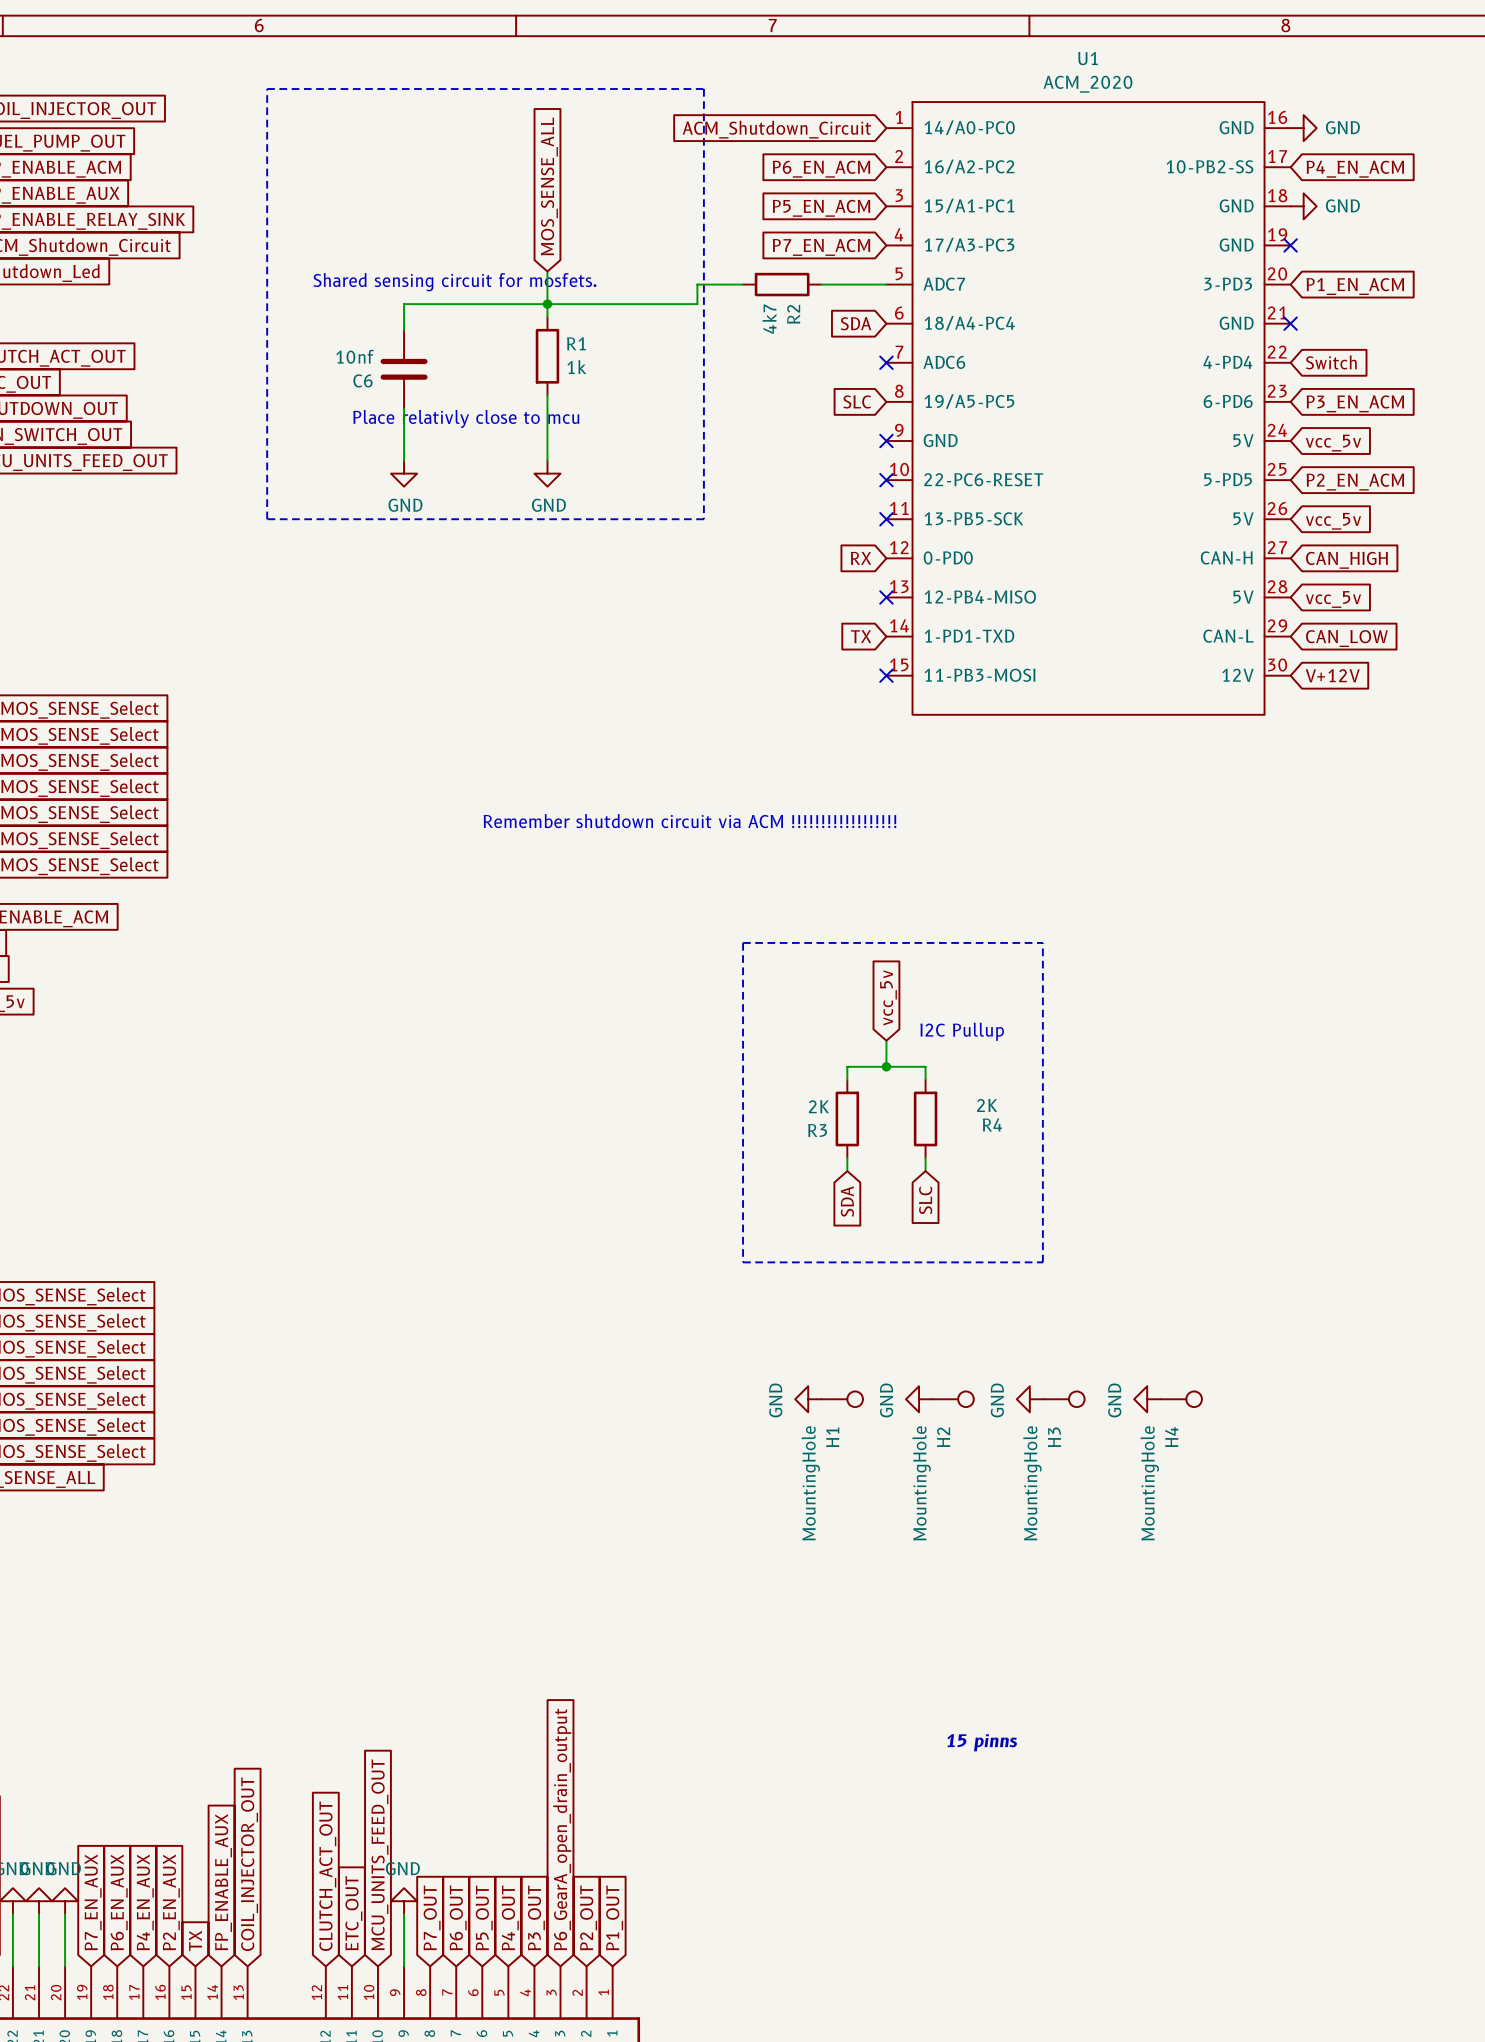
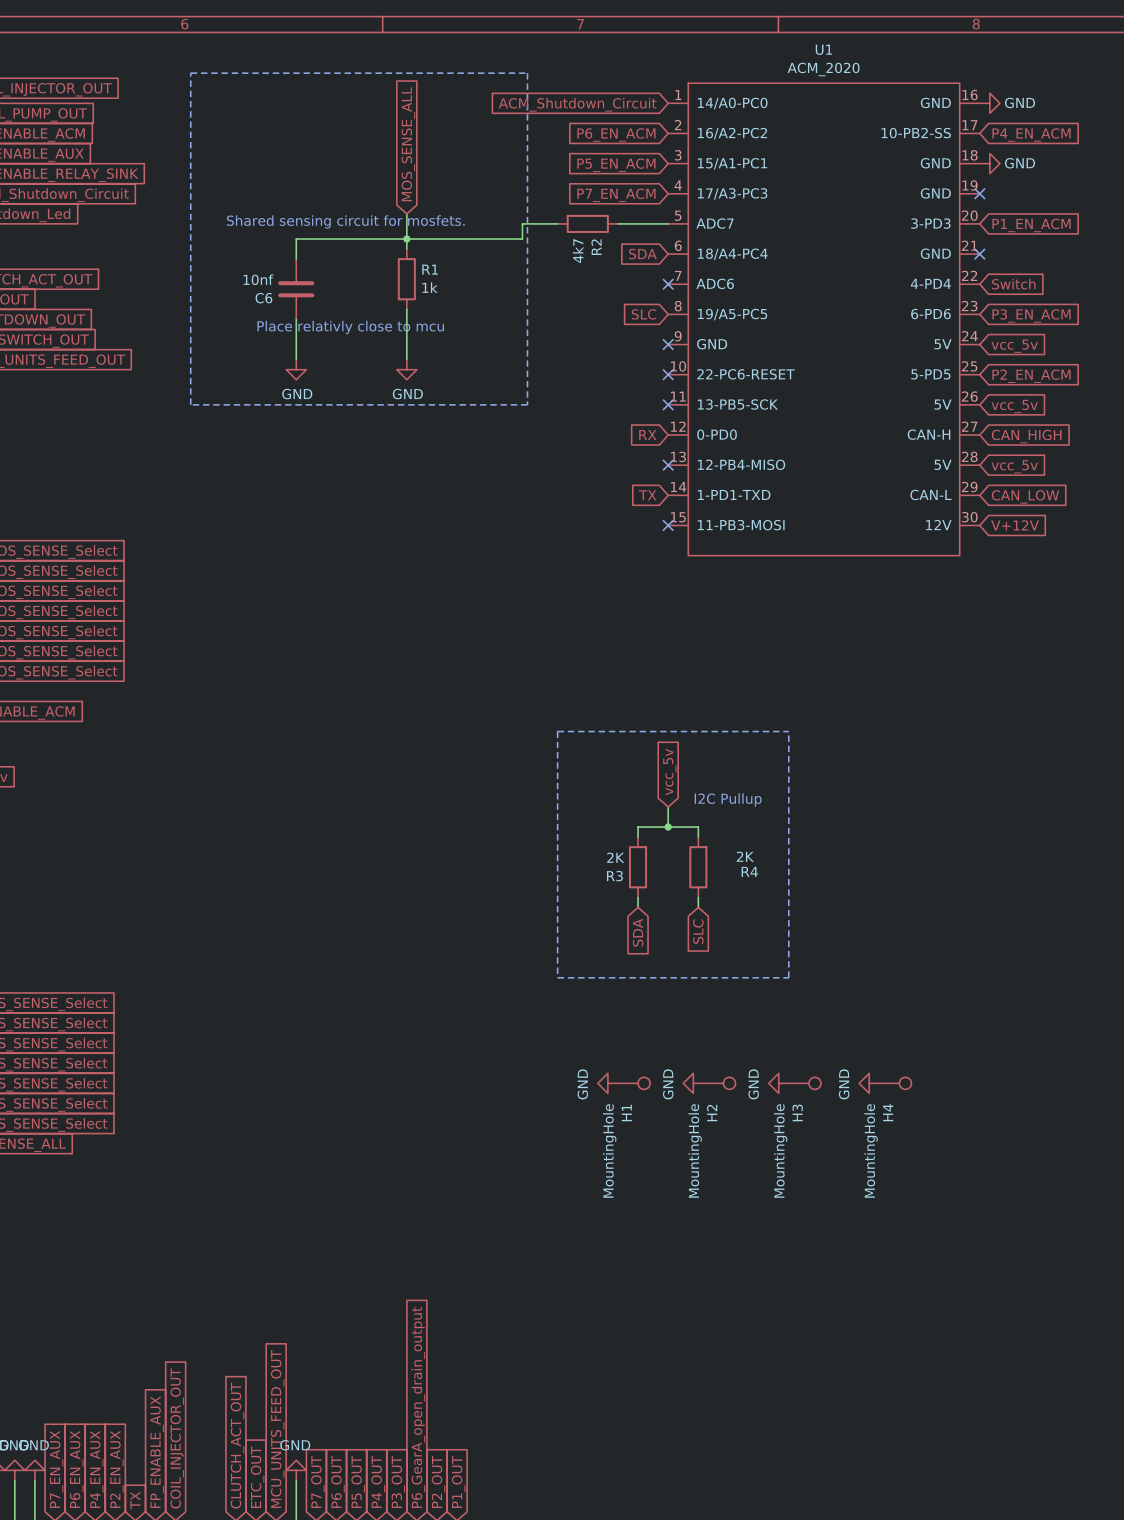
text: Remember shutdown circuit via ACM !!!!!!!!!!!!!!!!!! (690, 821) -> none
text: 15 pinns (982, 1742) -> none

